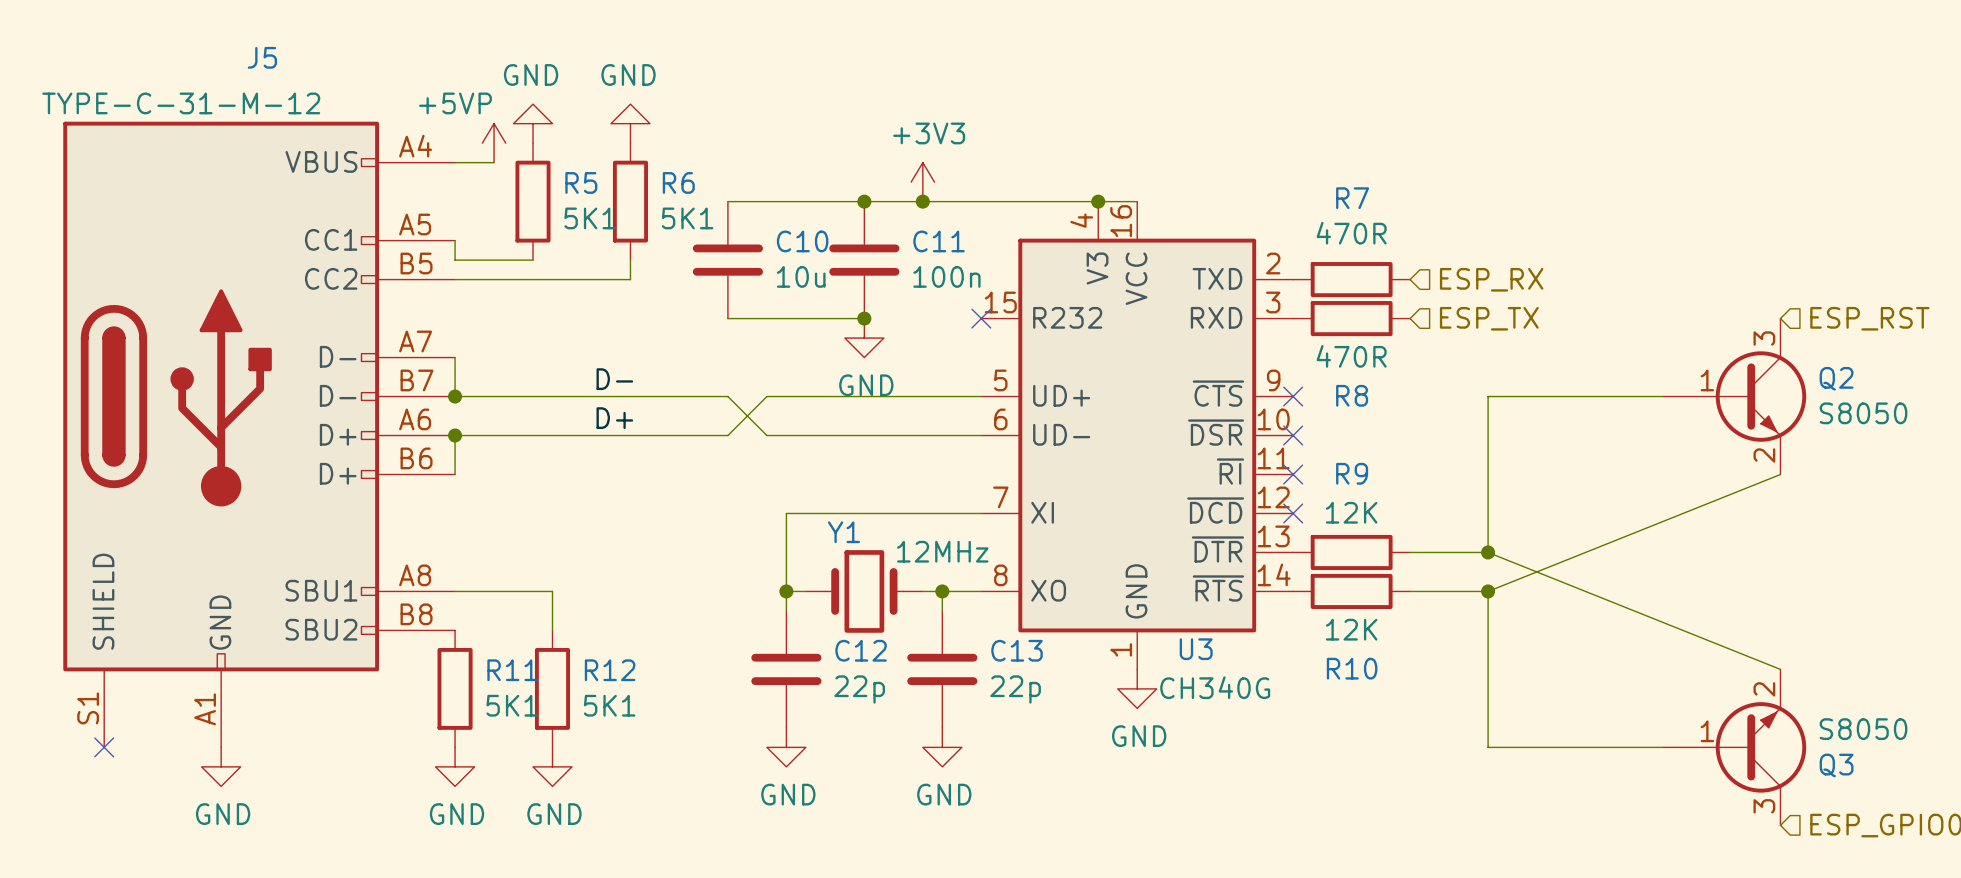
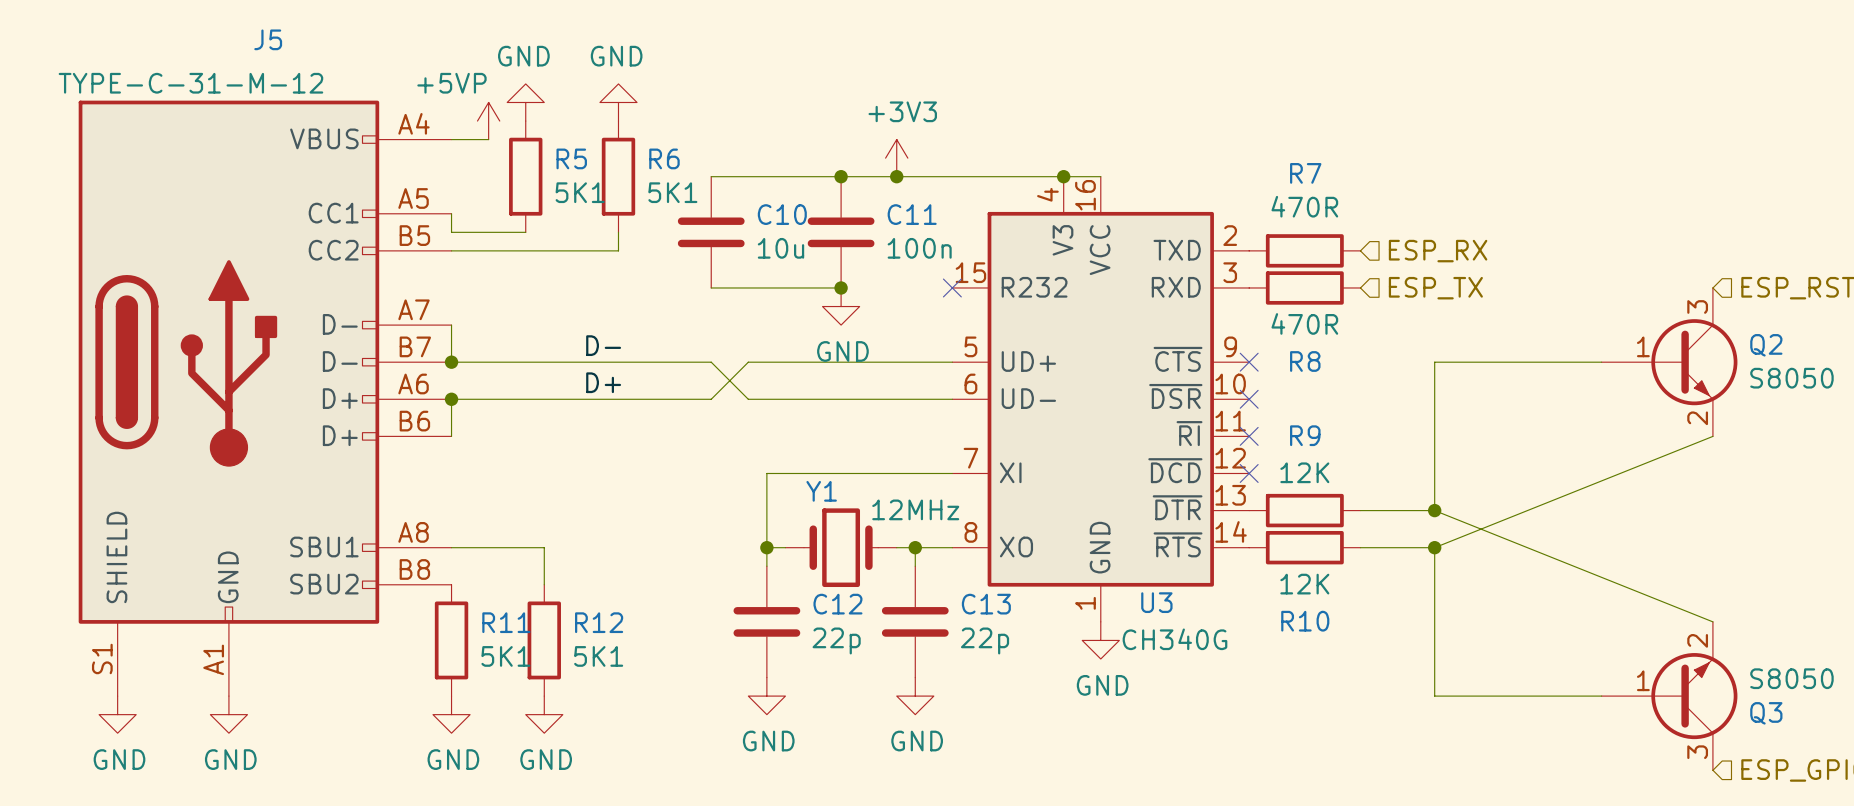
no-connect mark: (104, 747) -> none
power symbol: none -> GND (117, 714)

